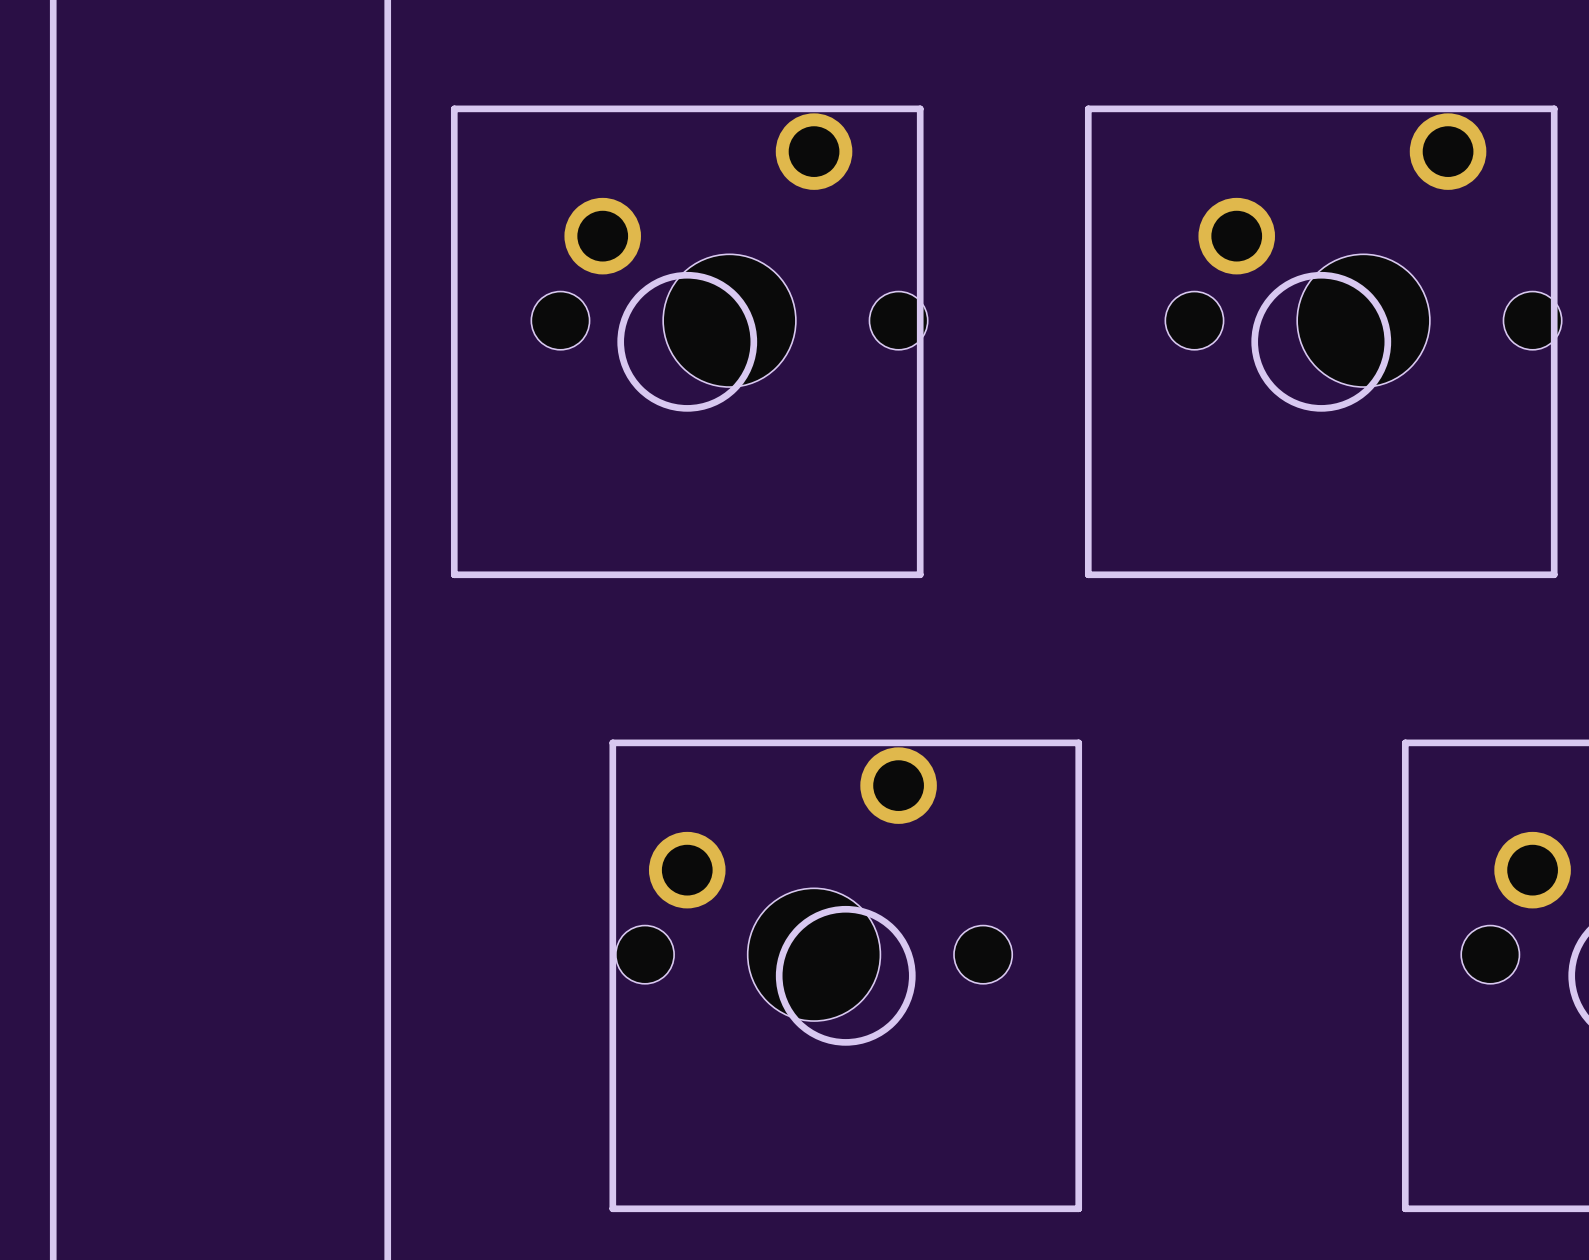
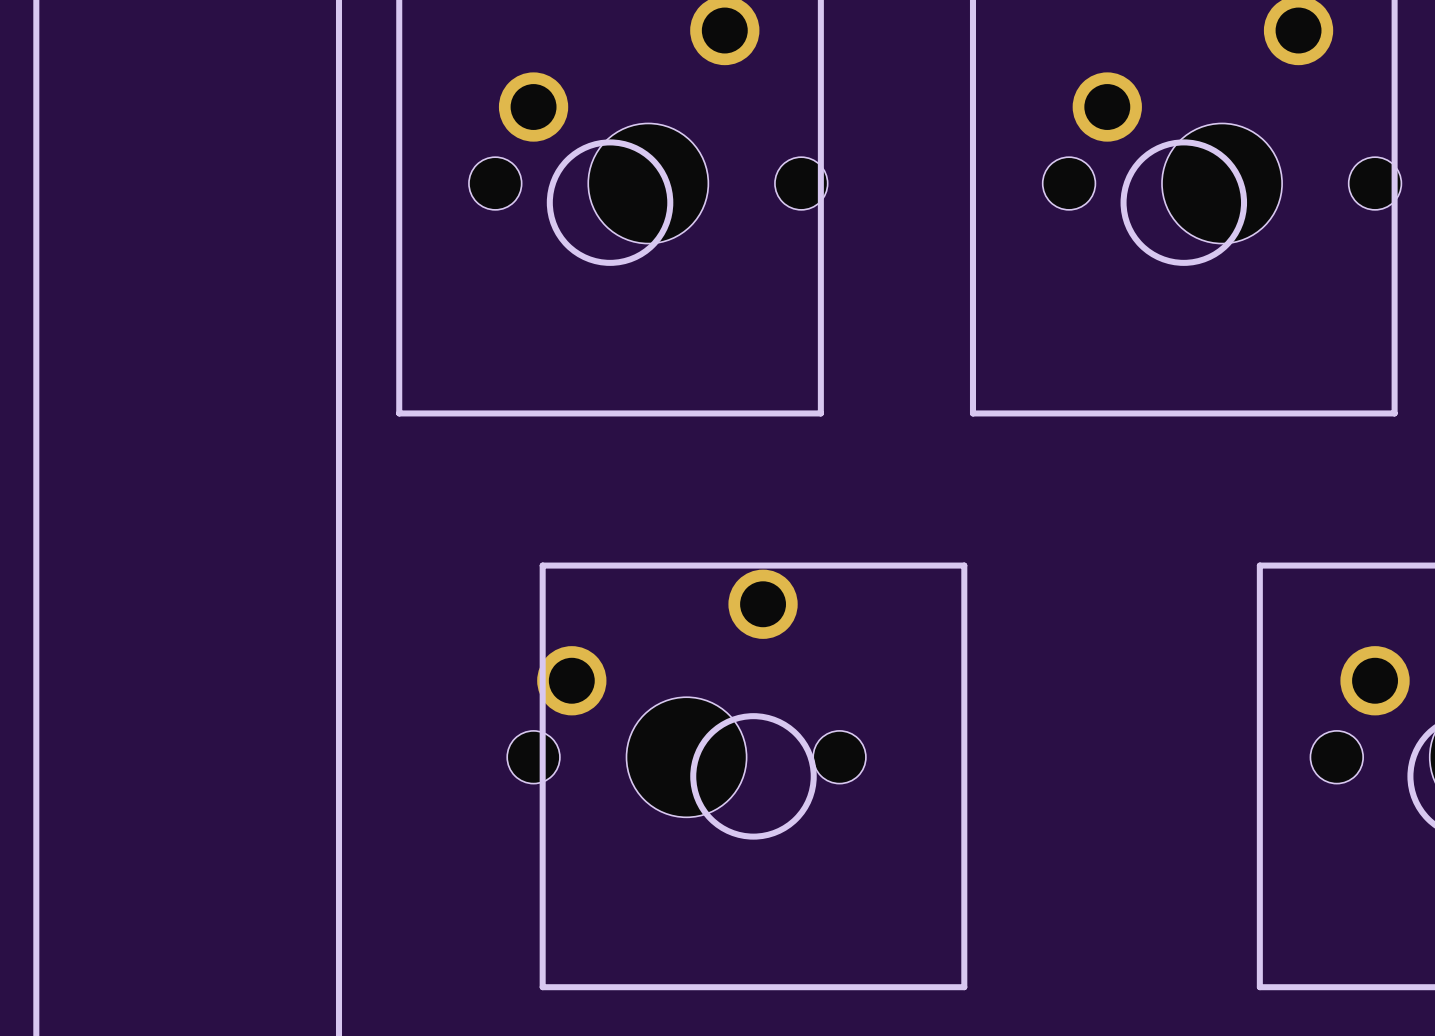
part position: (814, 884) -> (686, 693)

